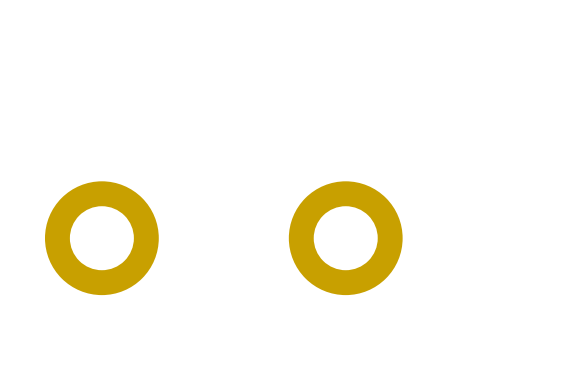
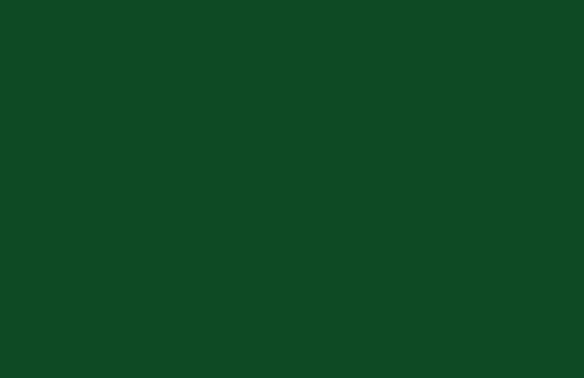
part: (101, 238) -> none
part: (345, 238) -> none

